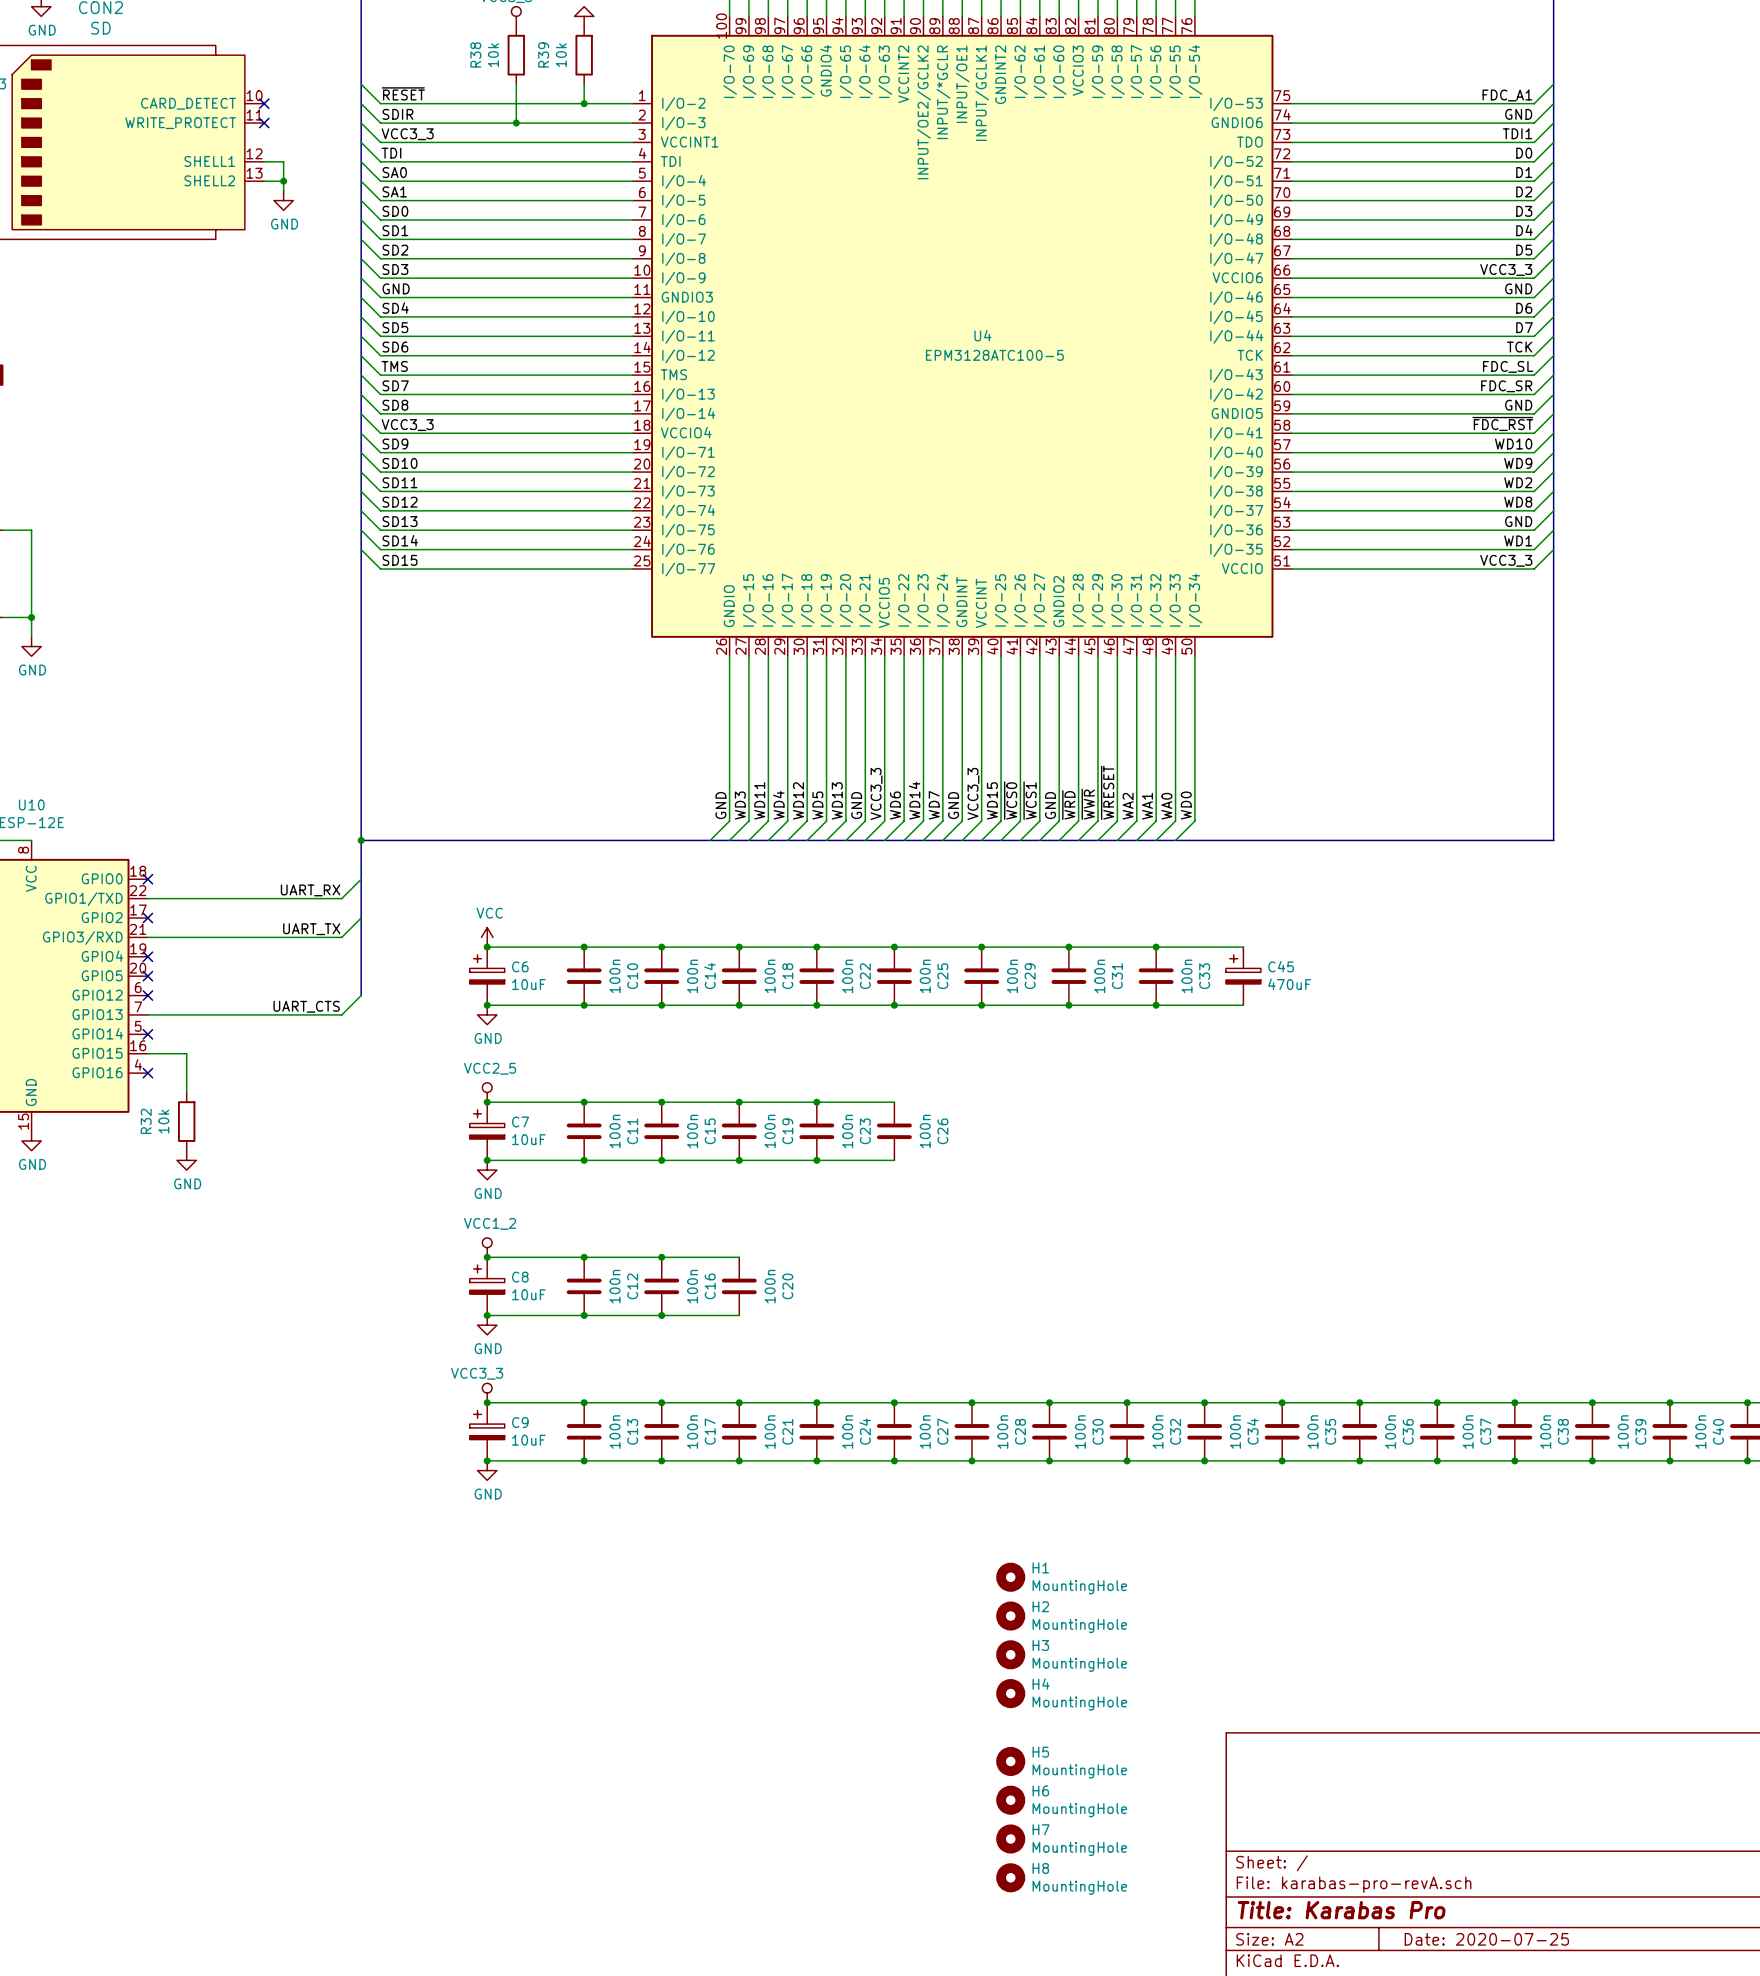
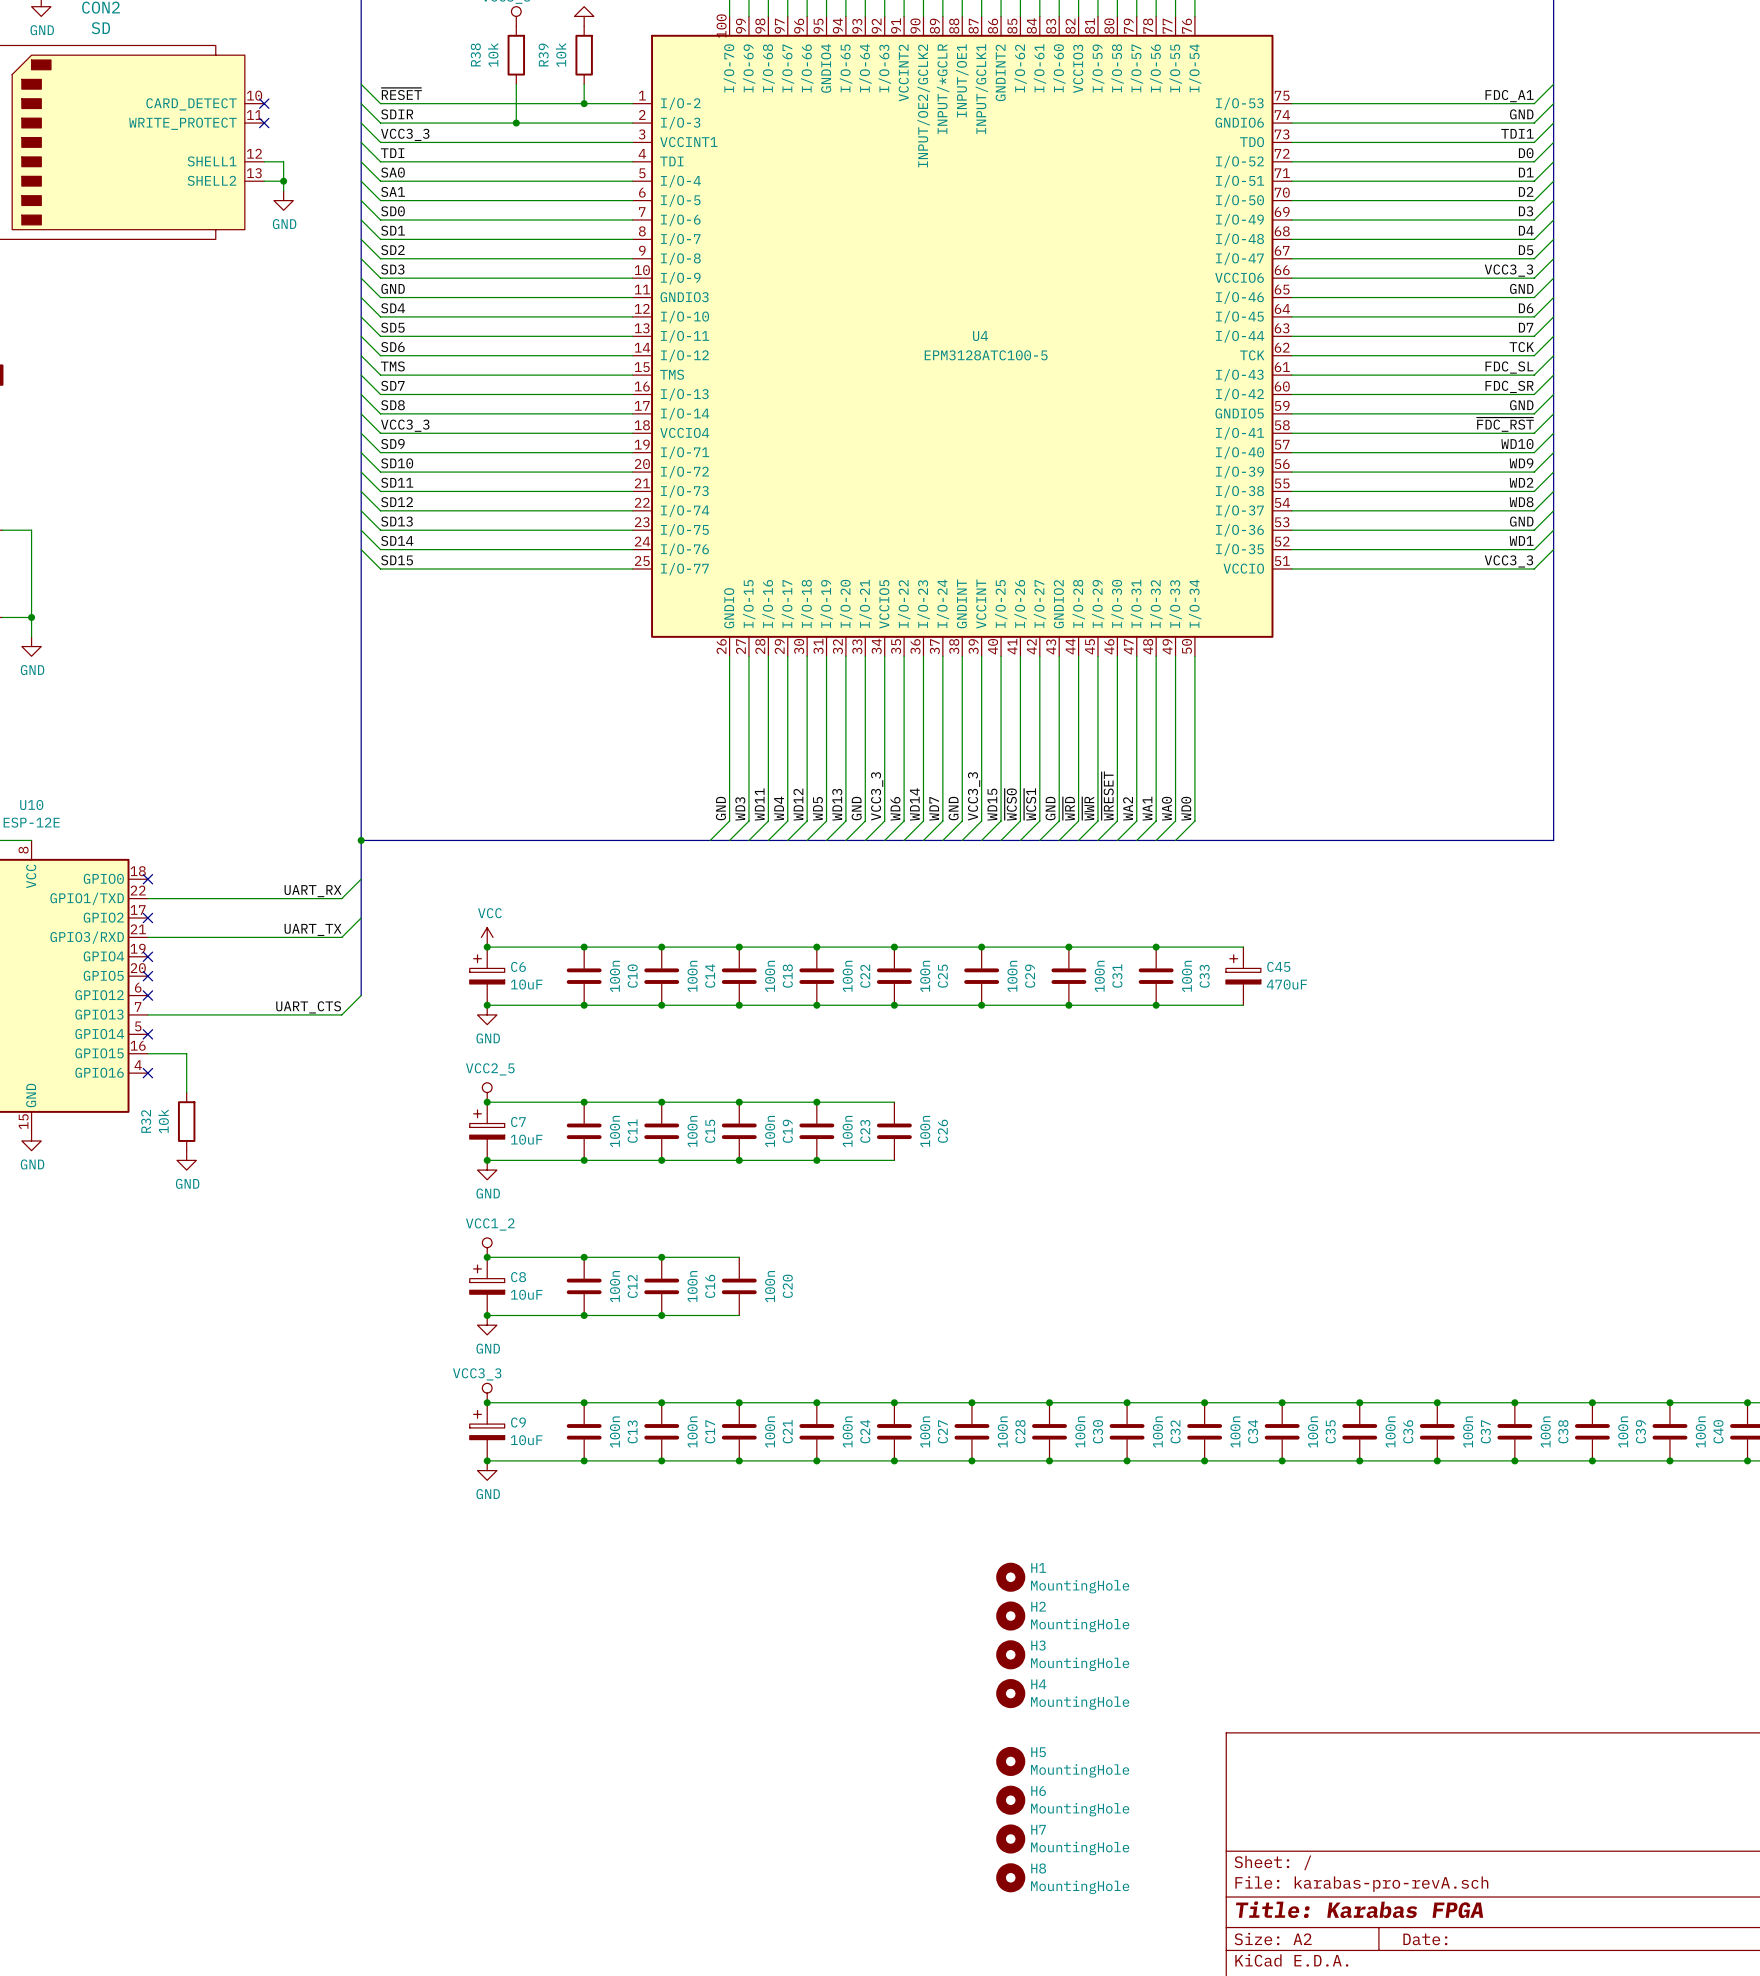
title block: Title: Karabas Pro (1341, 1910) -> Title: Karabas FPGA (1359, 1909)
title block: Date: 2020-07-25 (1486, 1939) -> Date: (1425, 1939)

